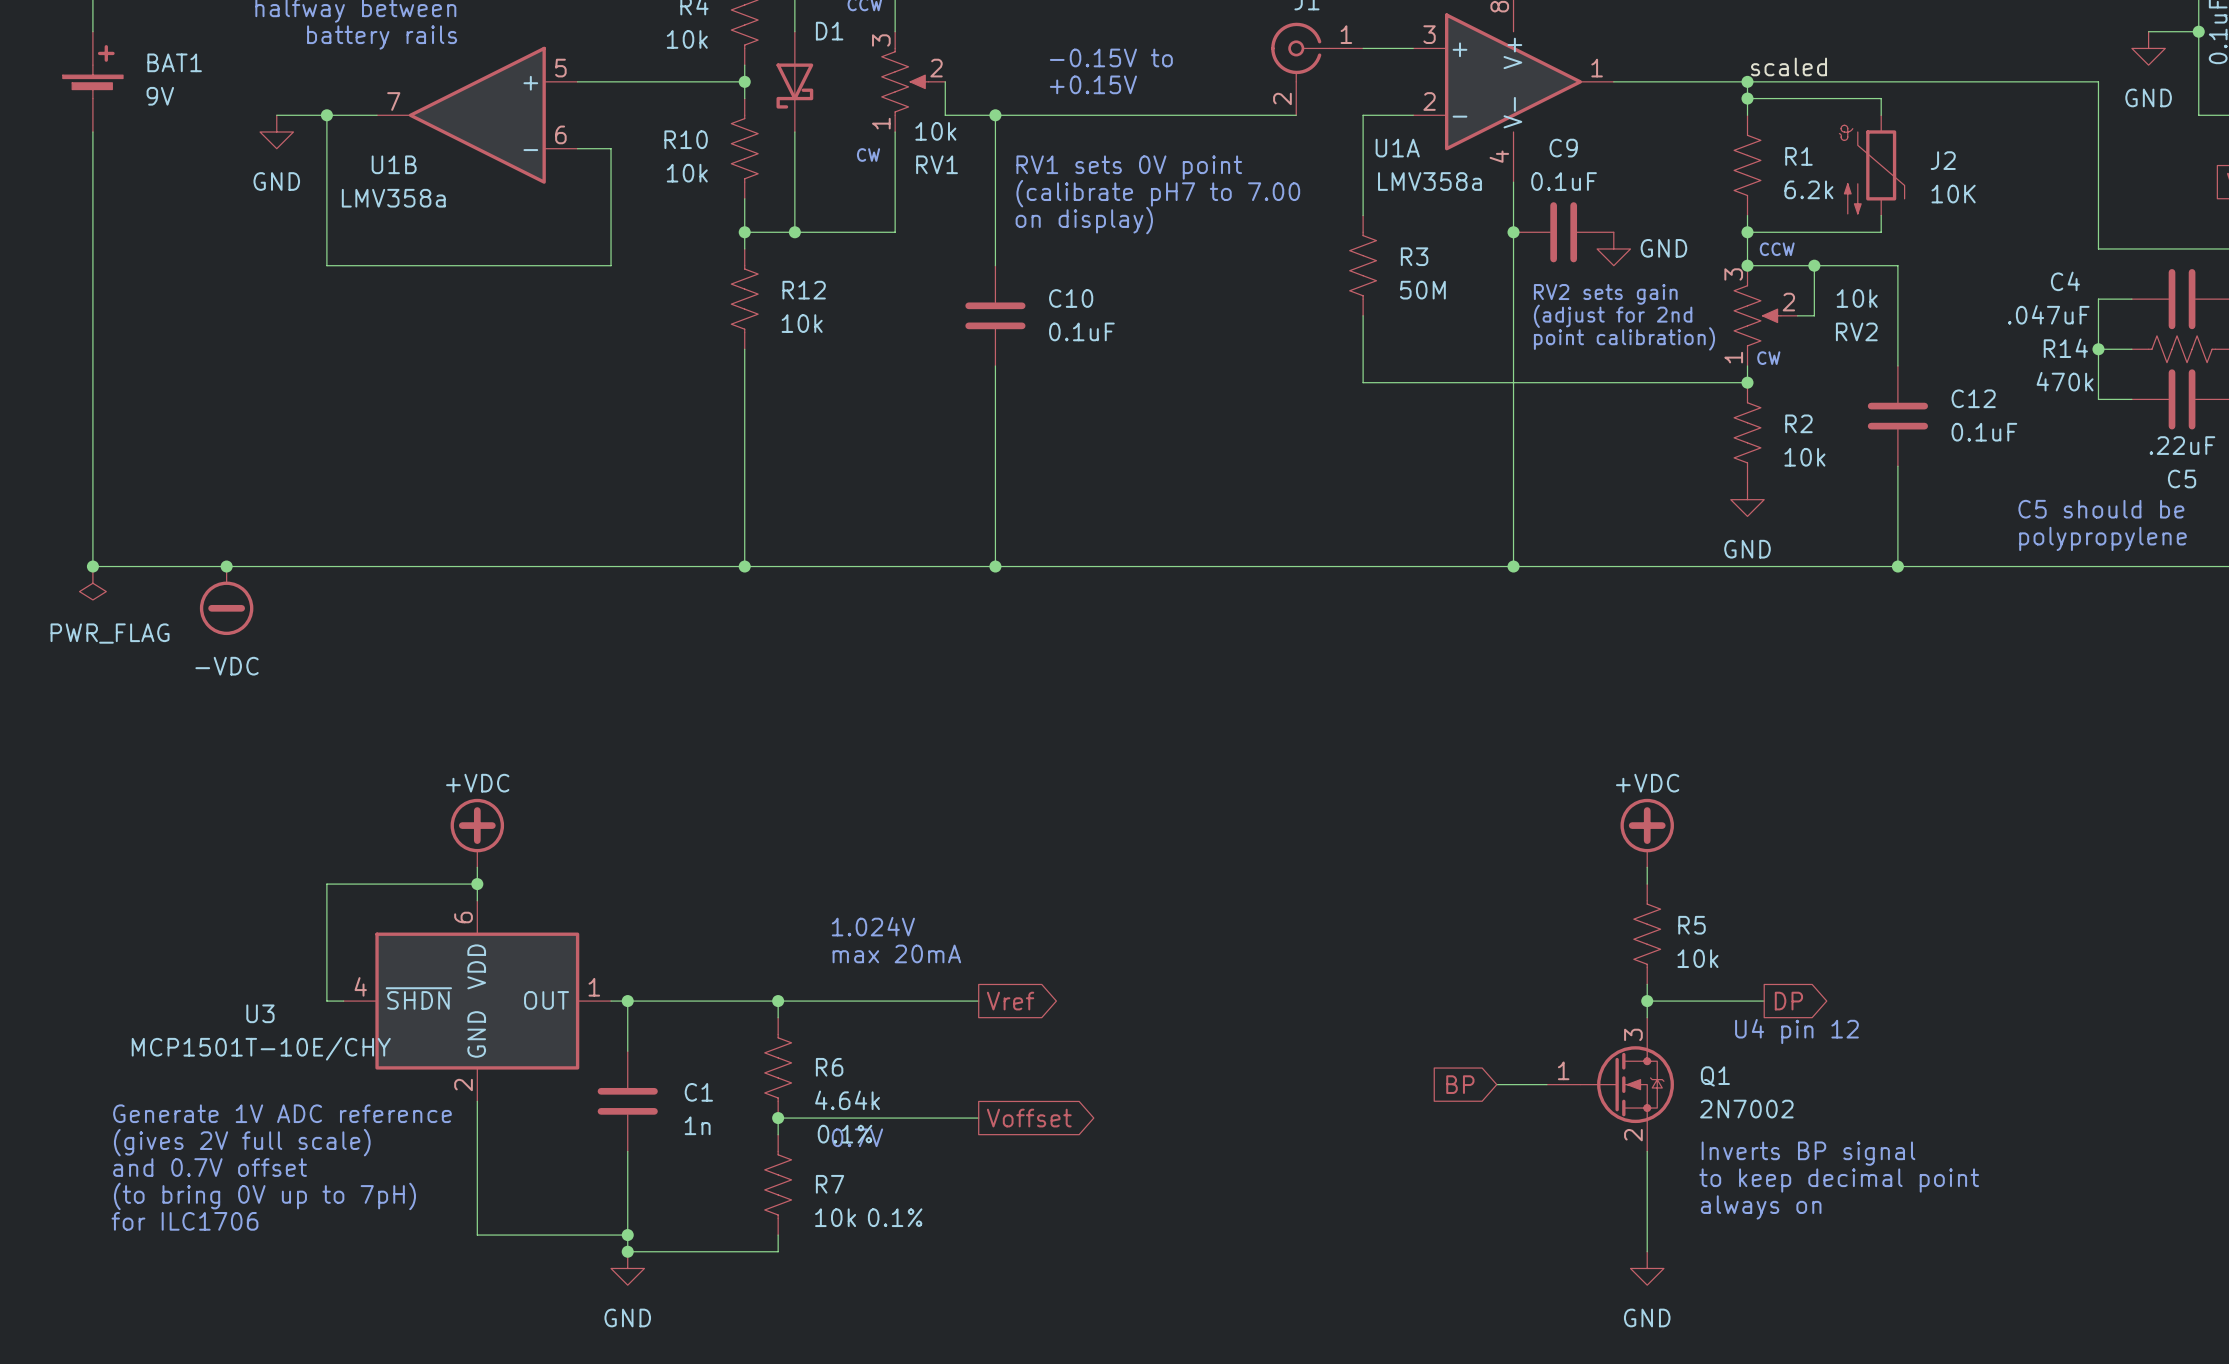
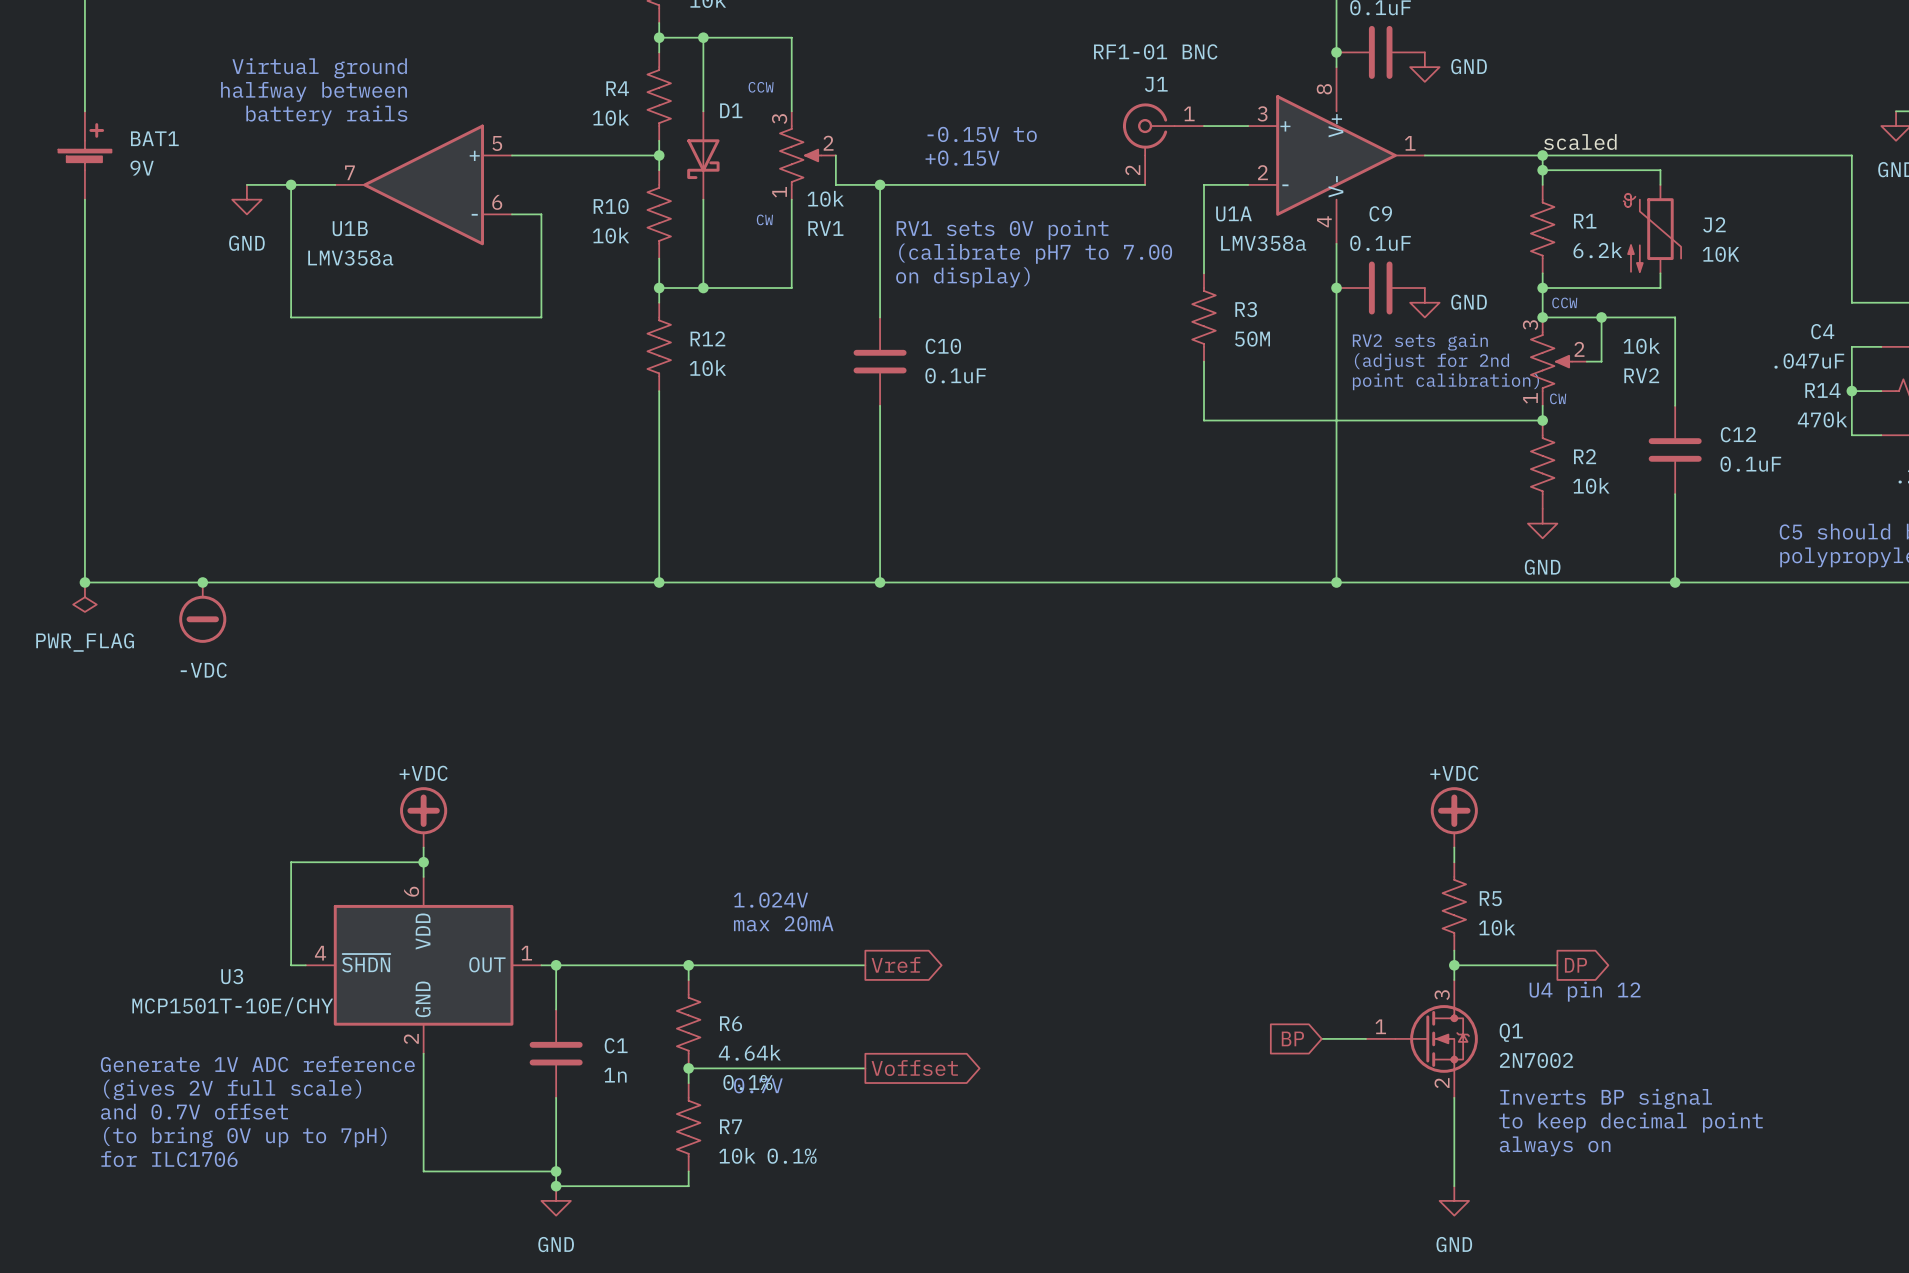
power symbol text position: PWR_FLAG (110, 633) -> PWR_FLAG (85, 642)

